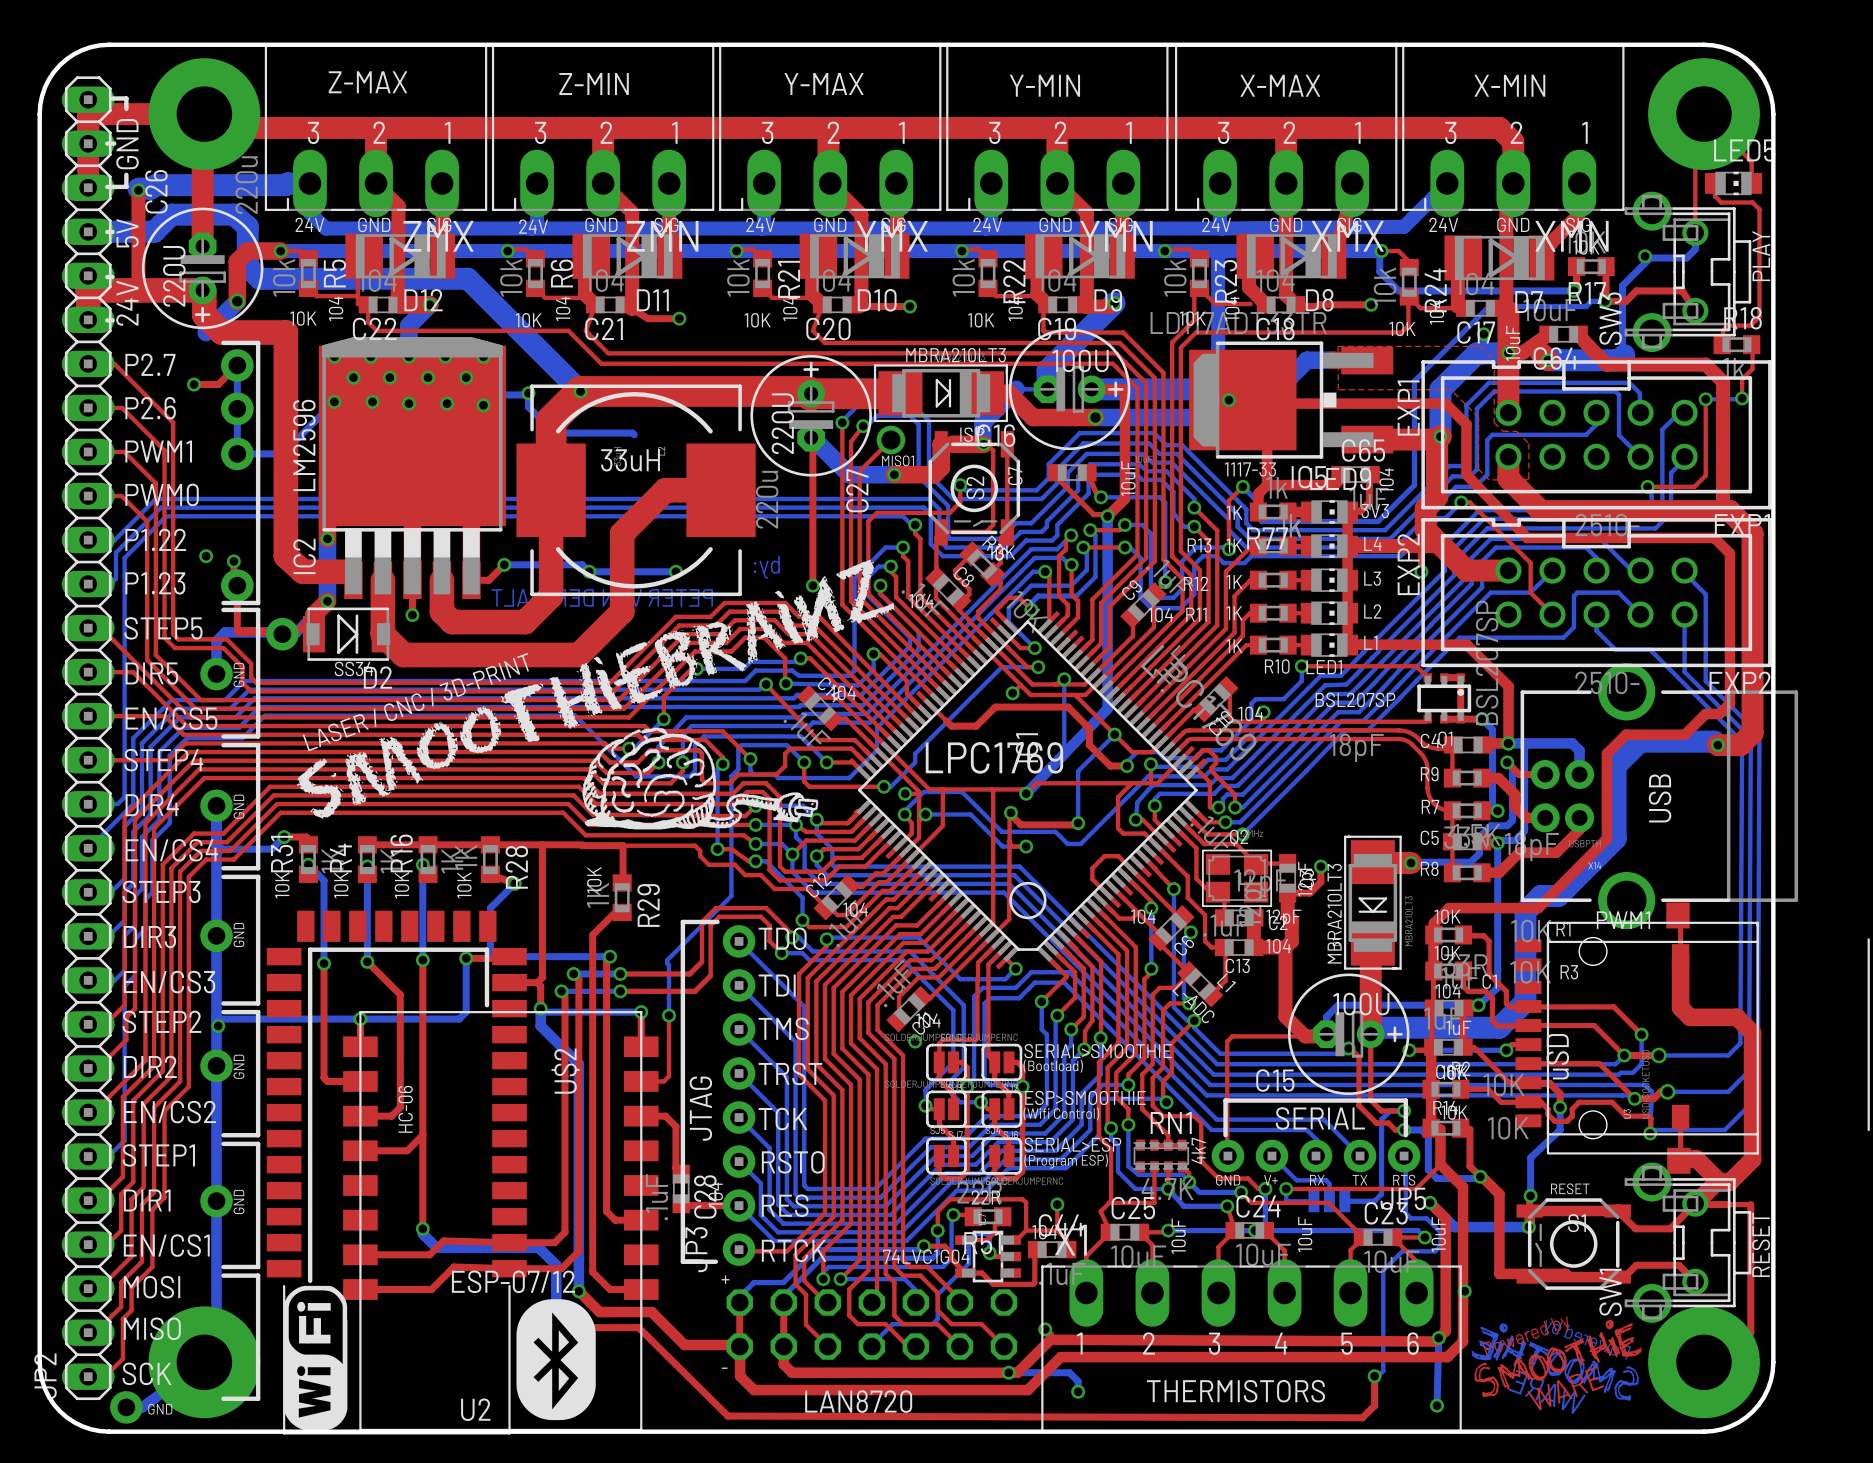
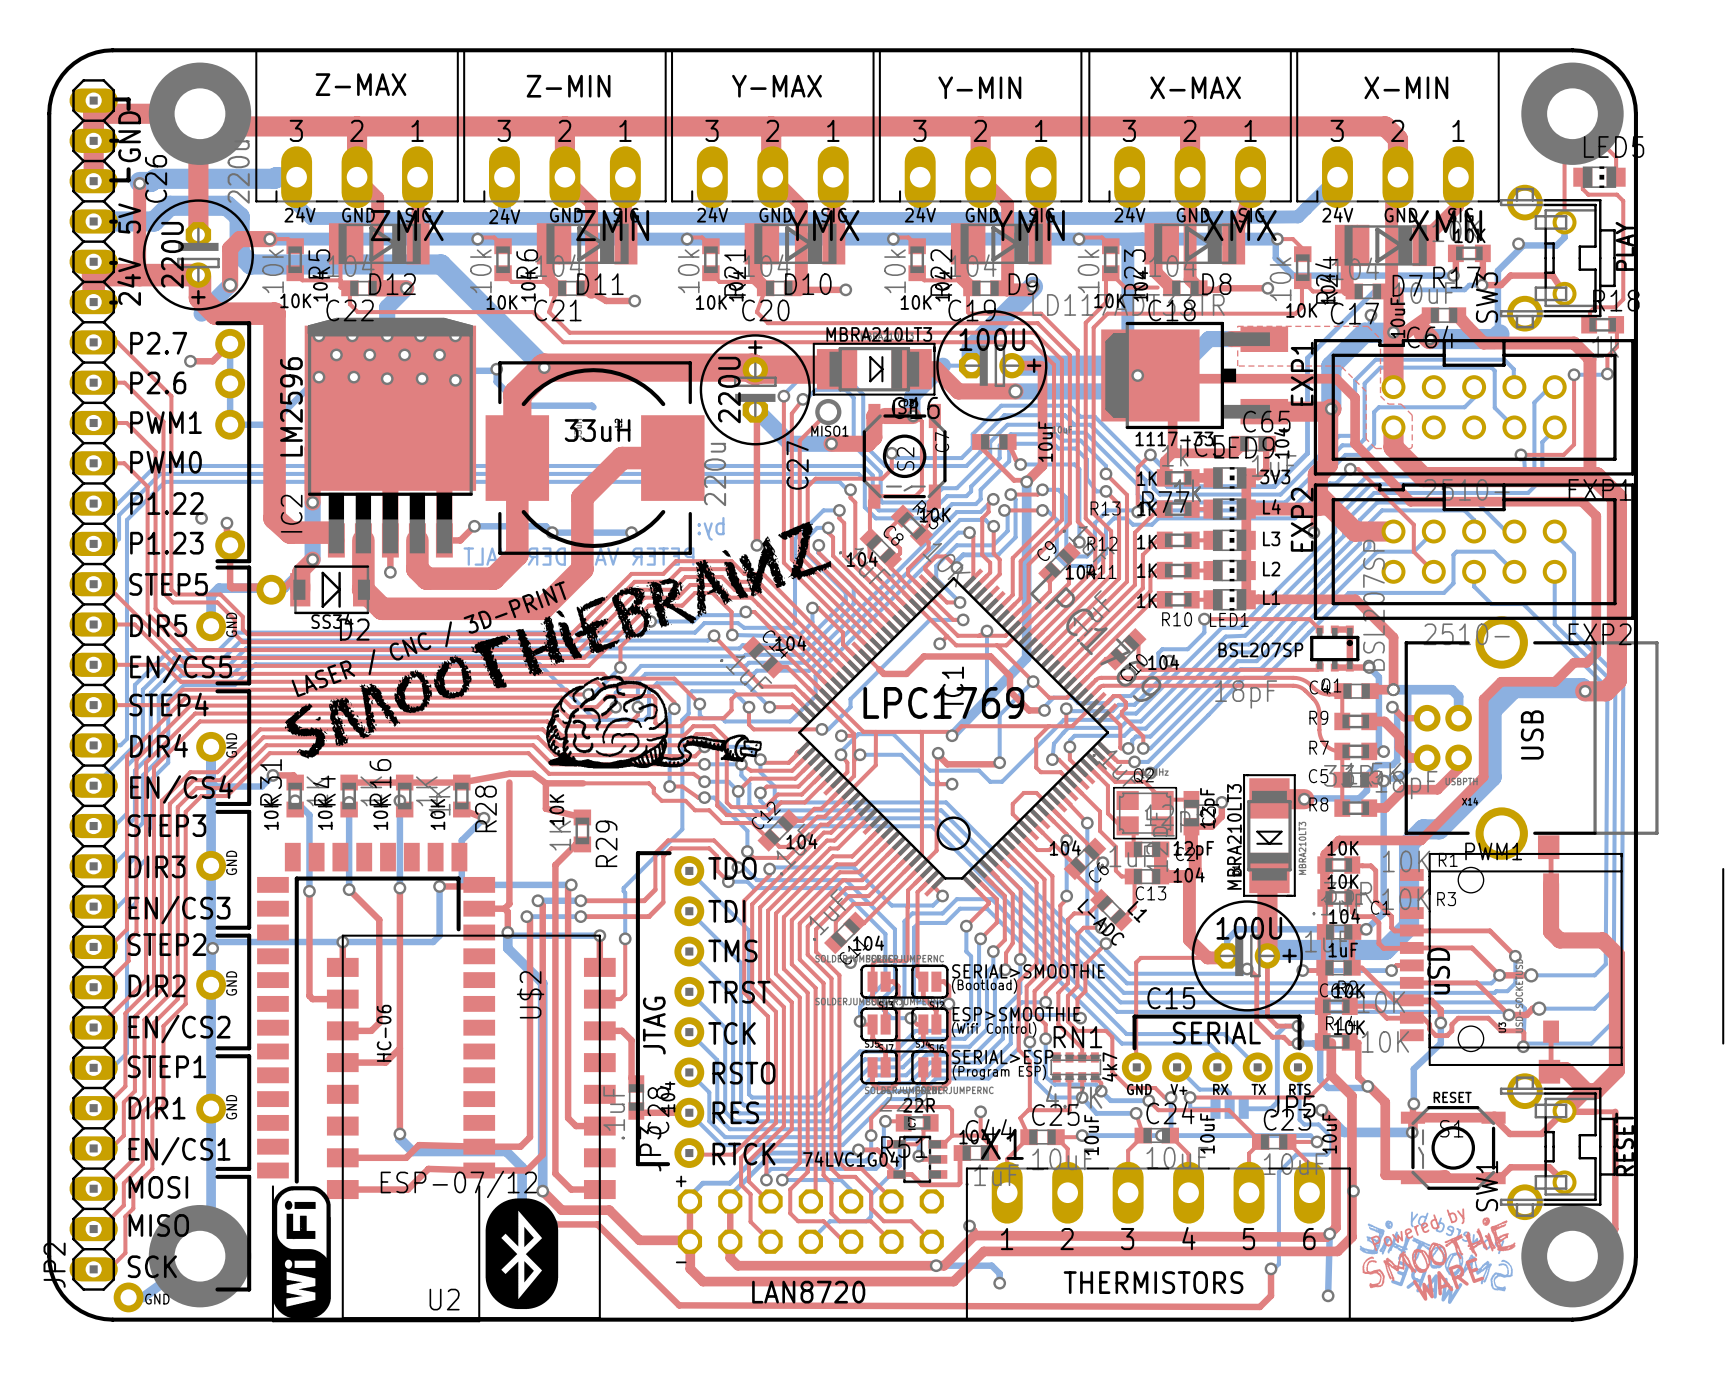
top track: (490, 844) (582, 845) -> (461, 782) (509, 773) (533, 773) (545, 783) (545, 808) (582, 817)
top track: (623, 845) (622, 882) -> none

